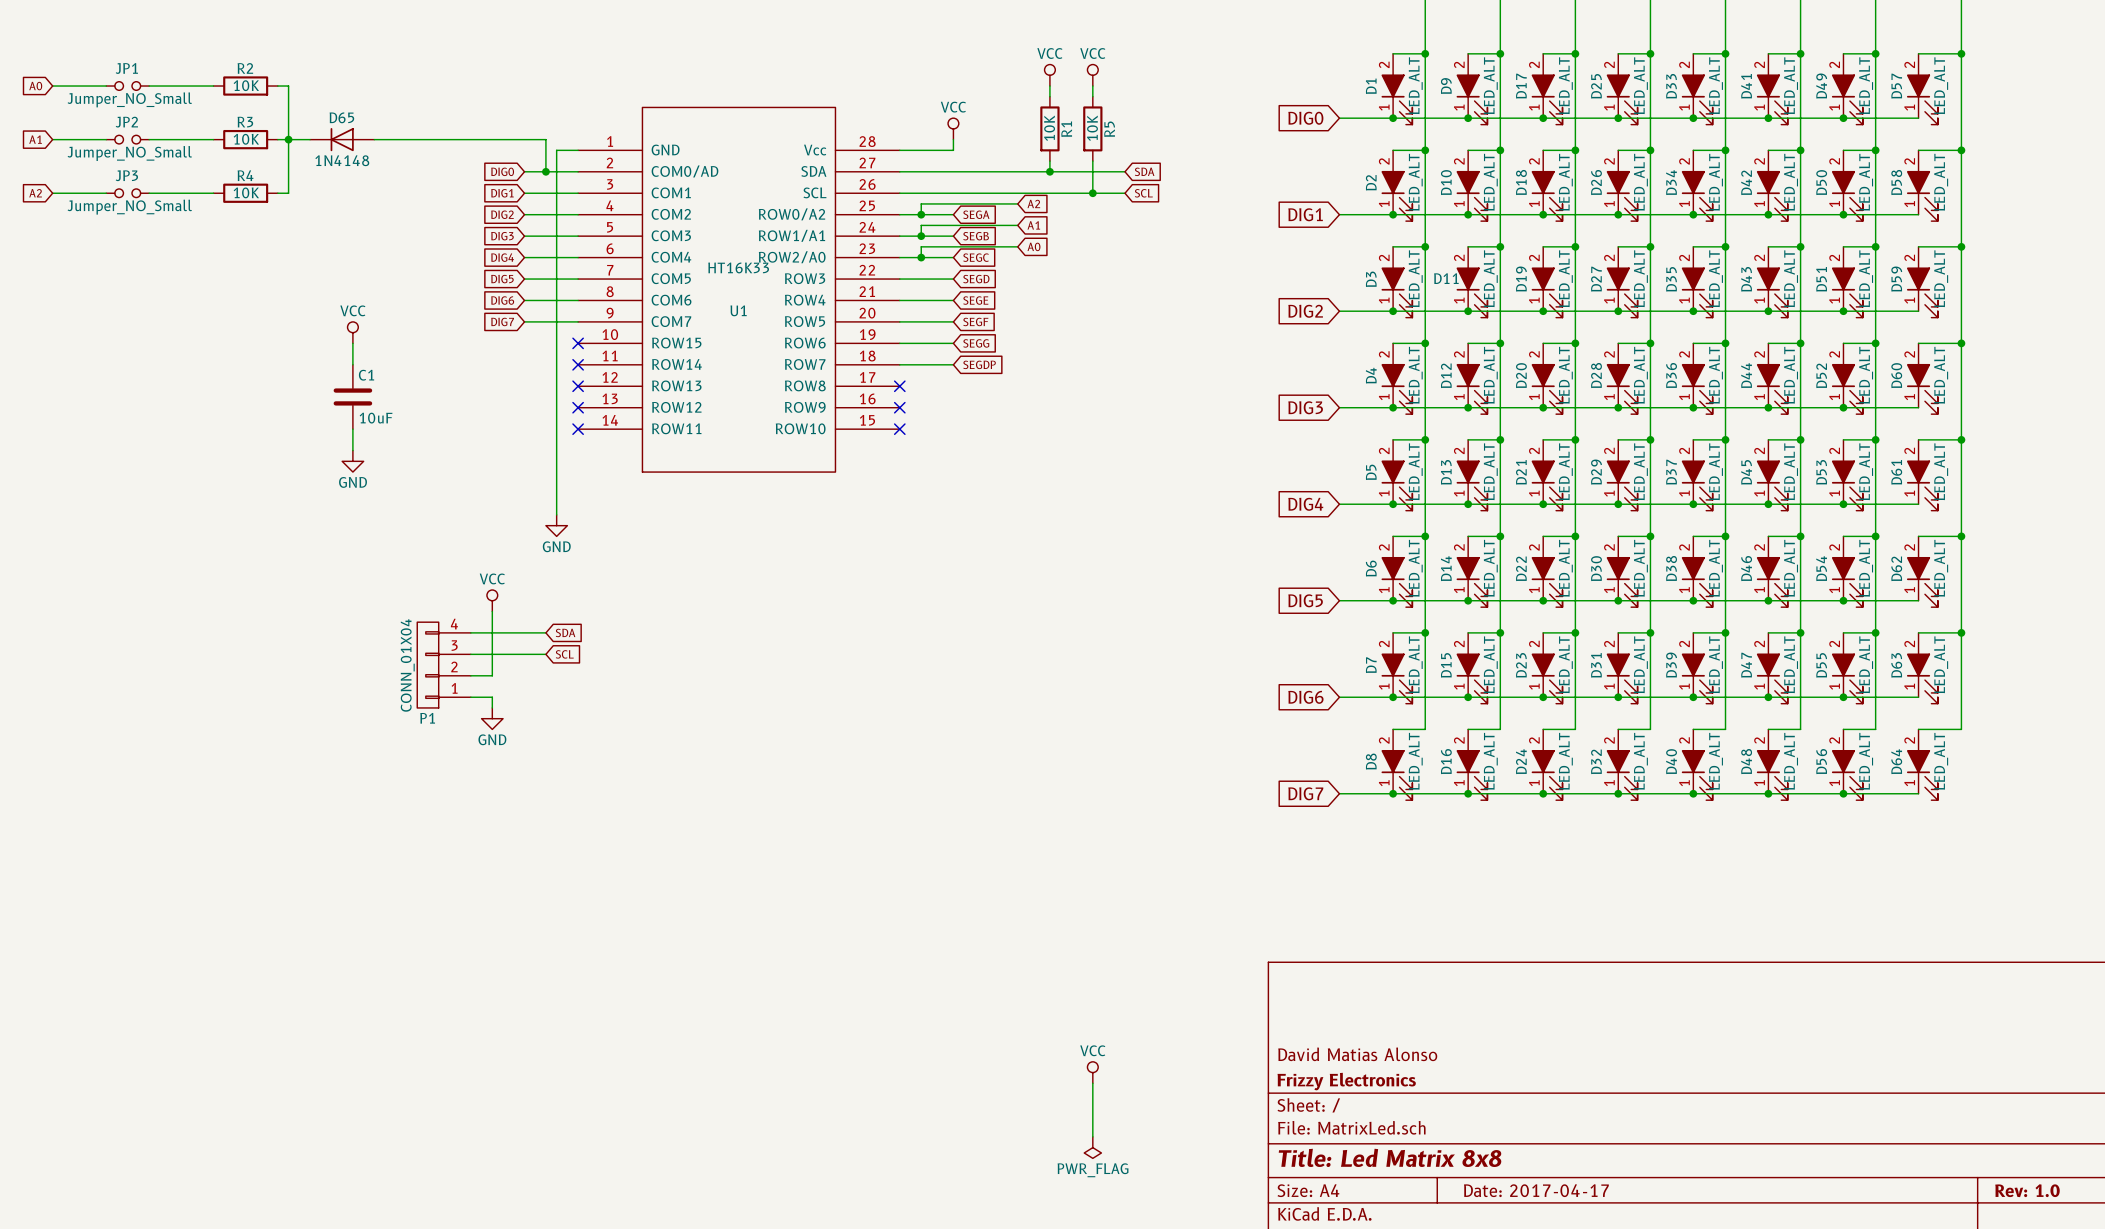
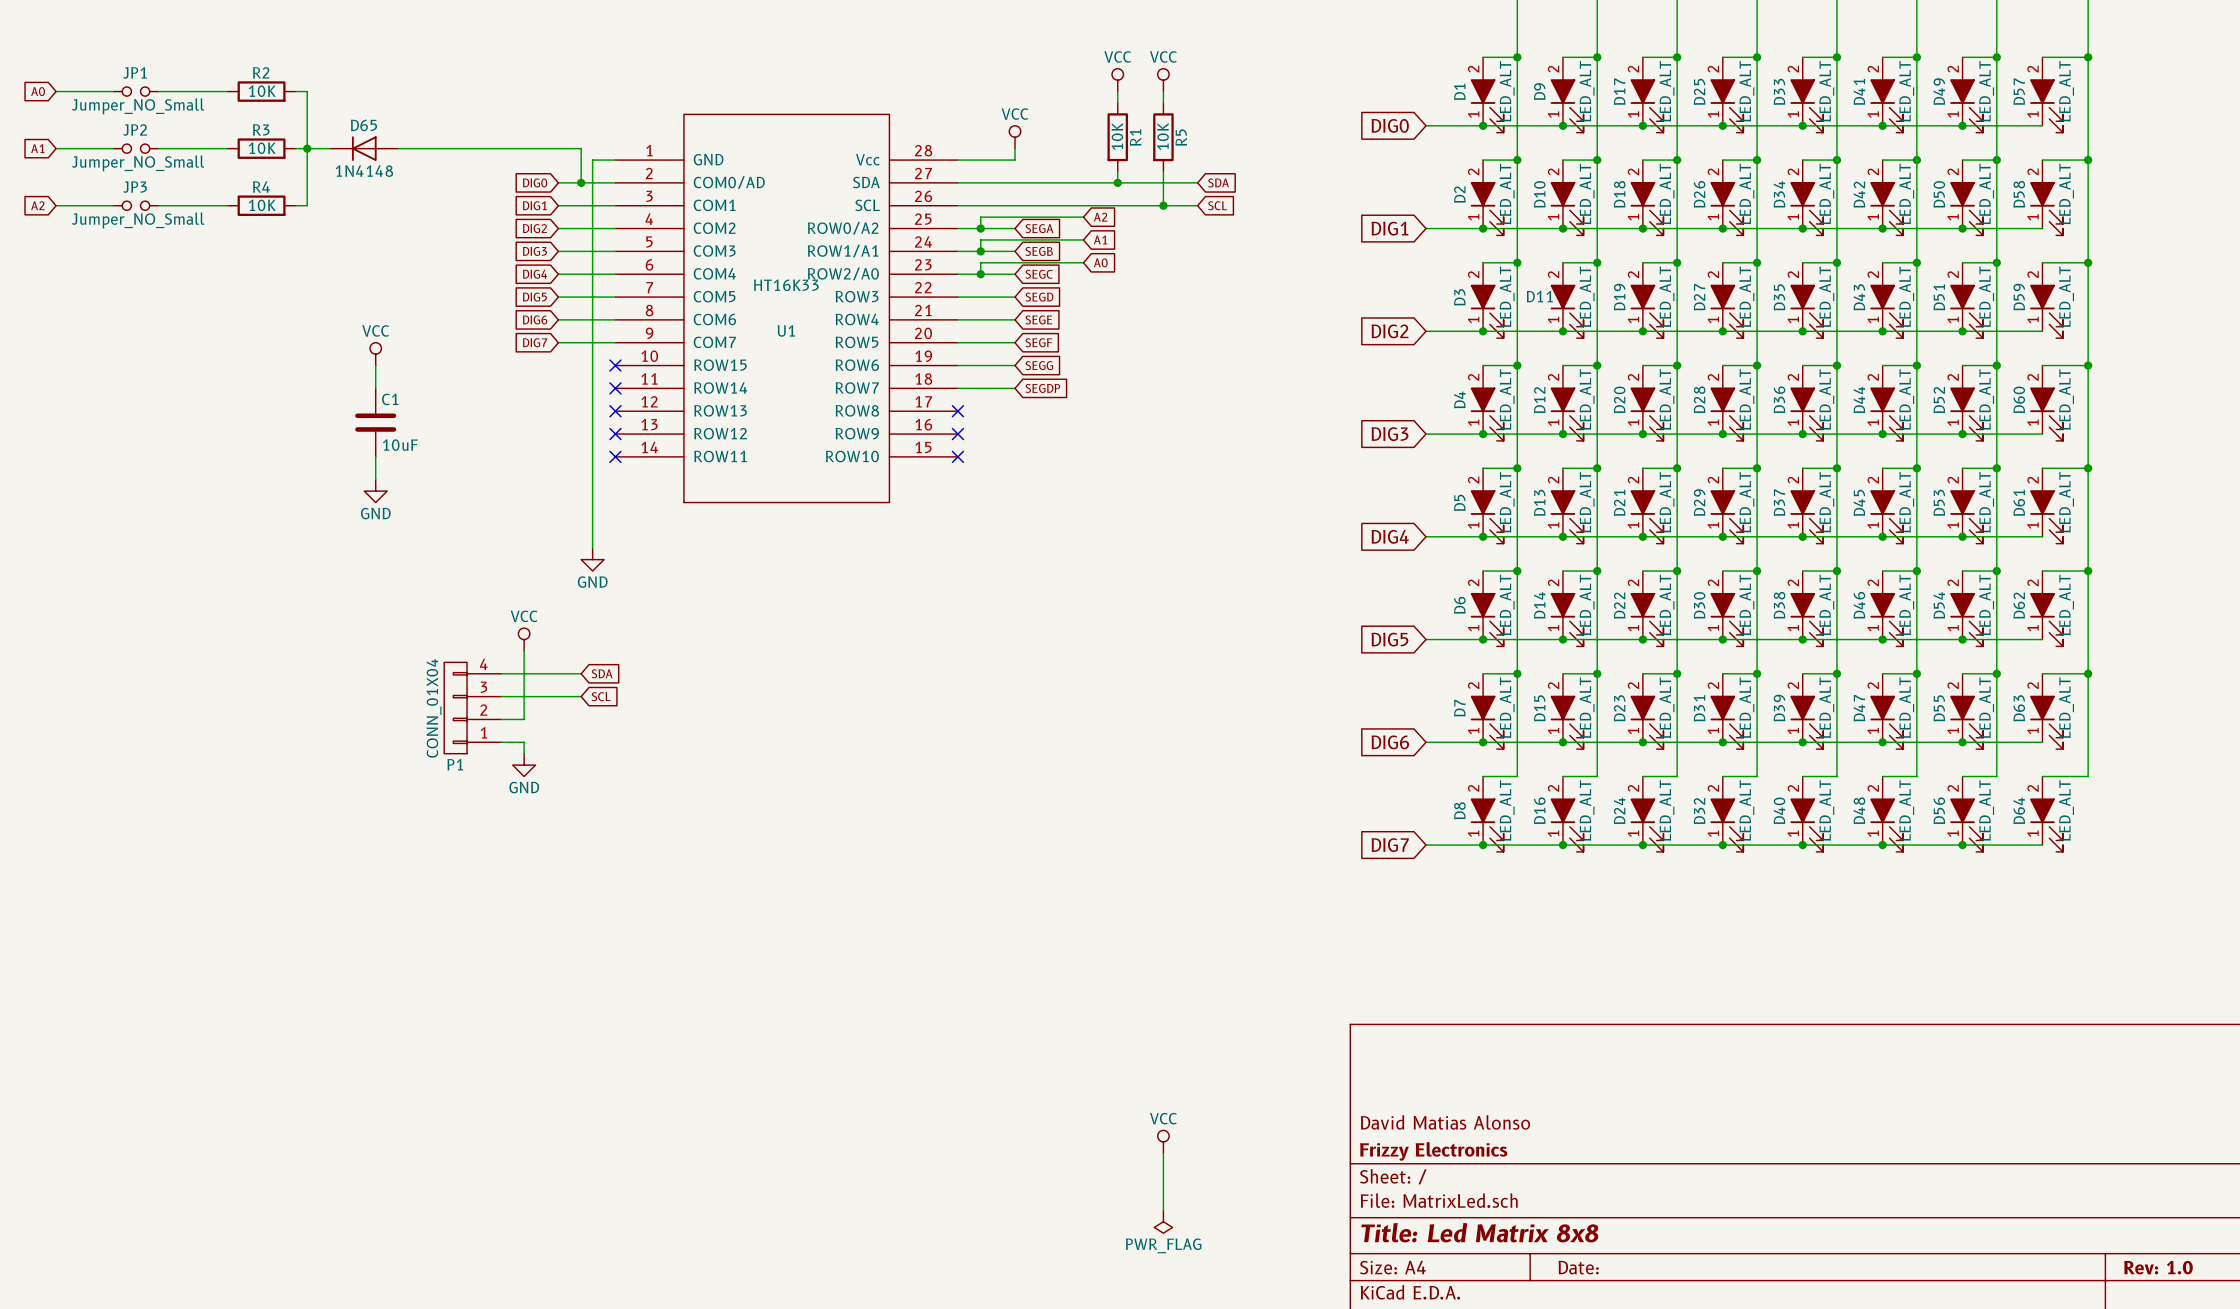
title block: Date: 2017-04-17 (1536, 1190) -> Date: (1578, 1267)

